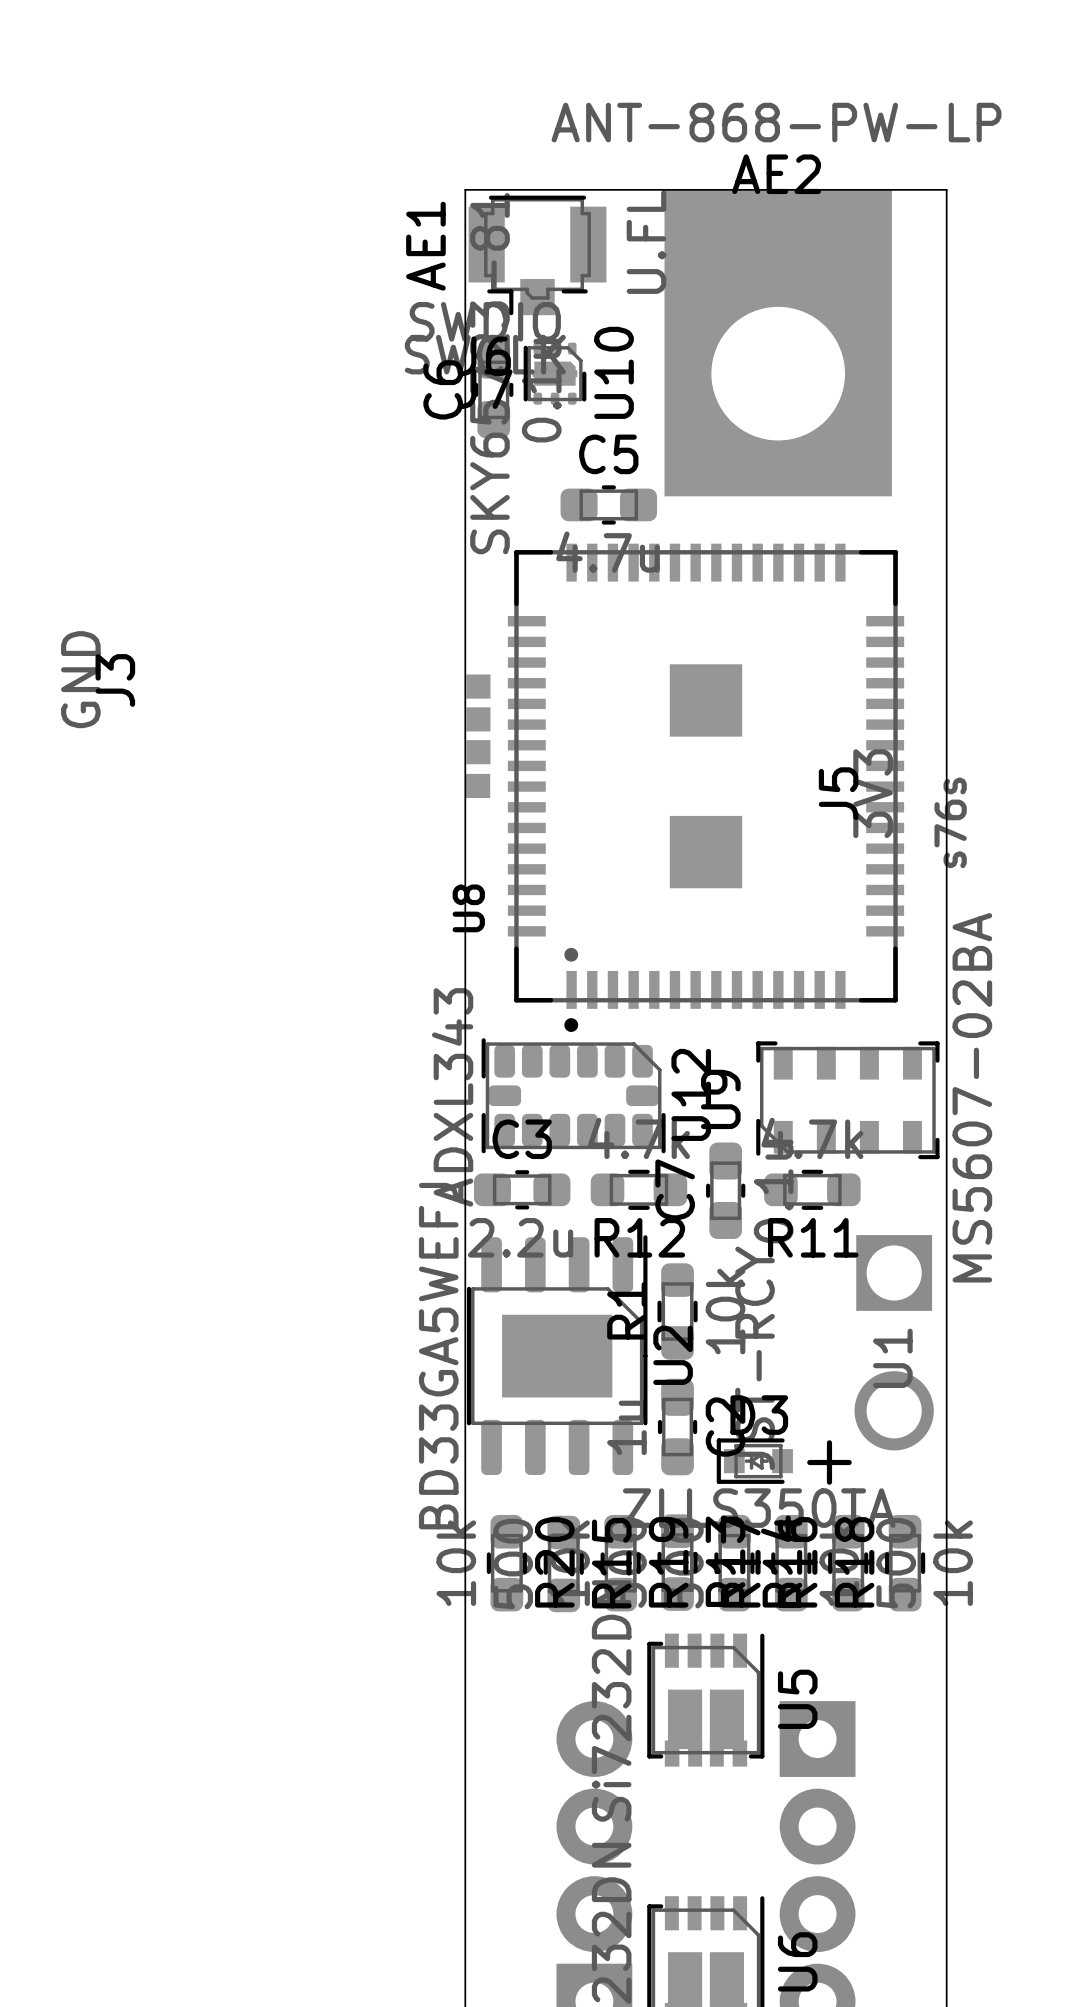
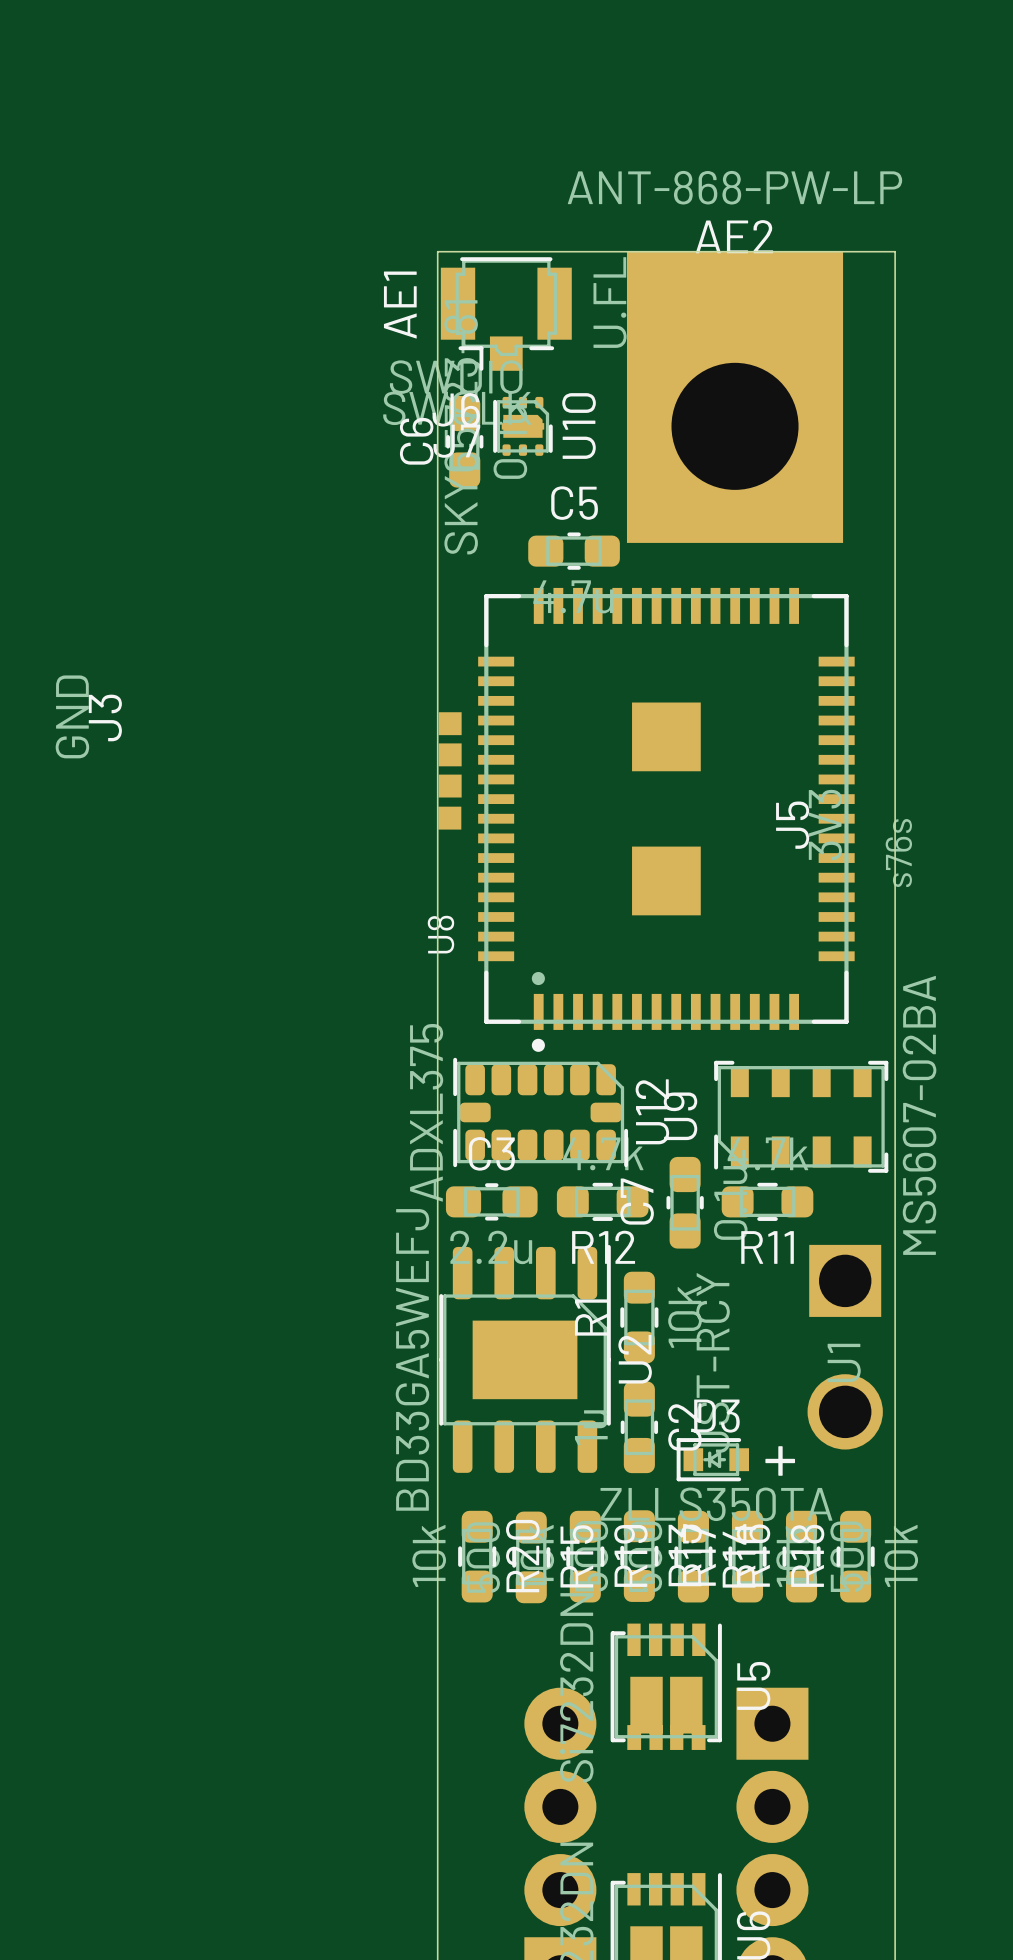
U12 value: ADXL343 (452, 1097) -> ADXL375 (426, 1112)

